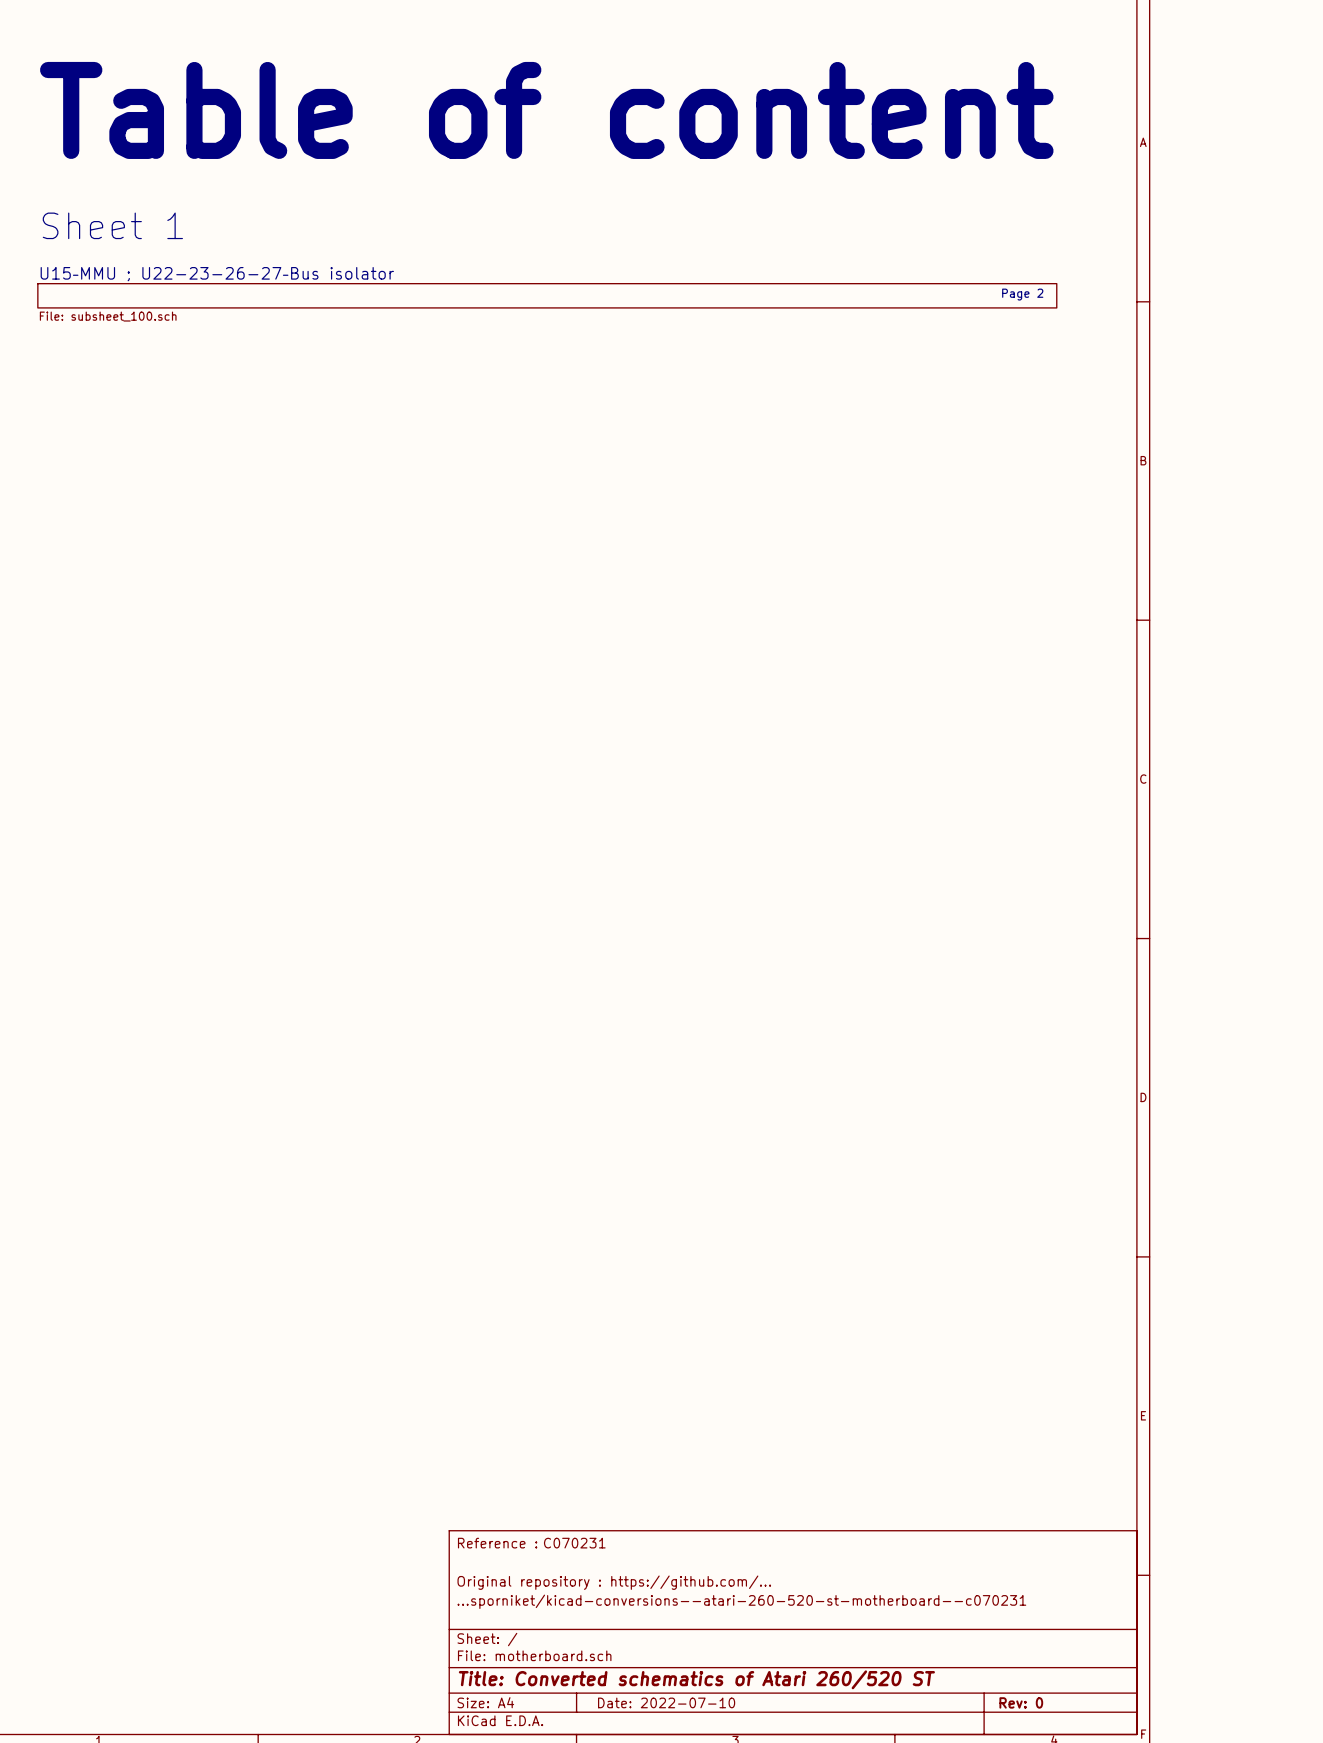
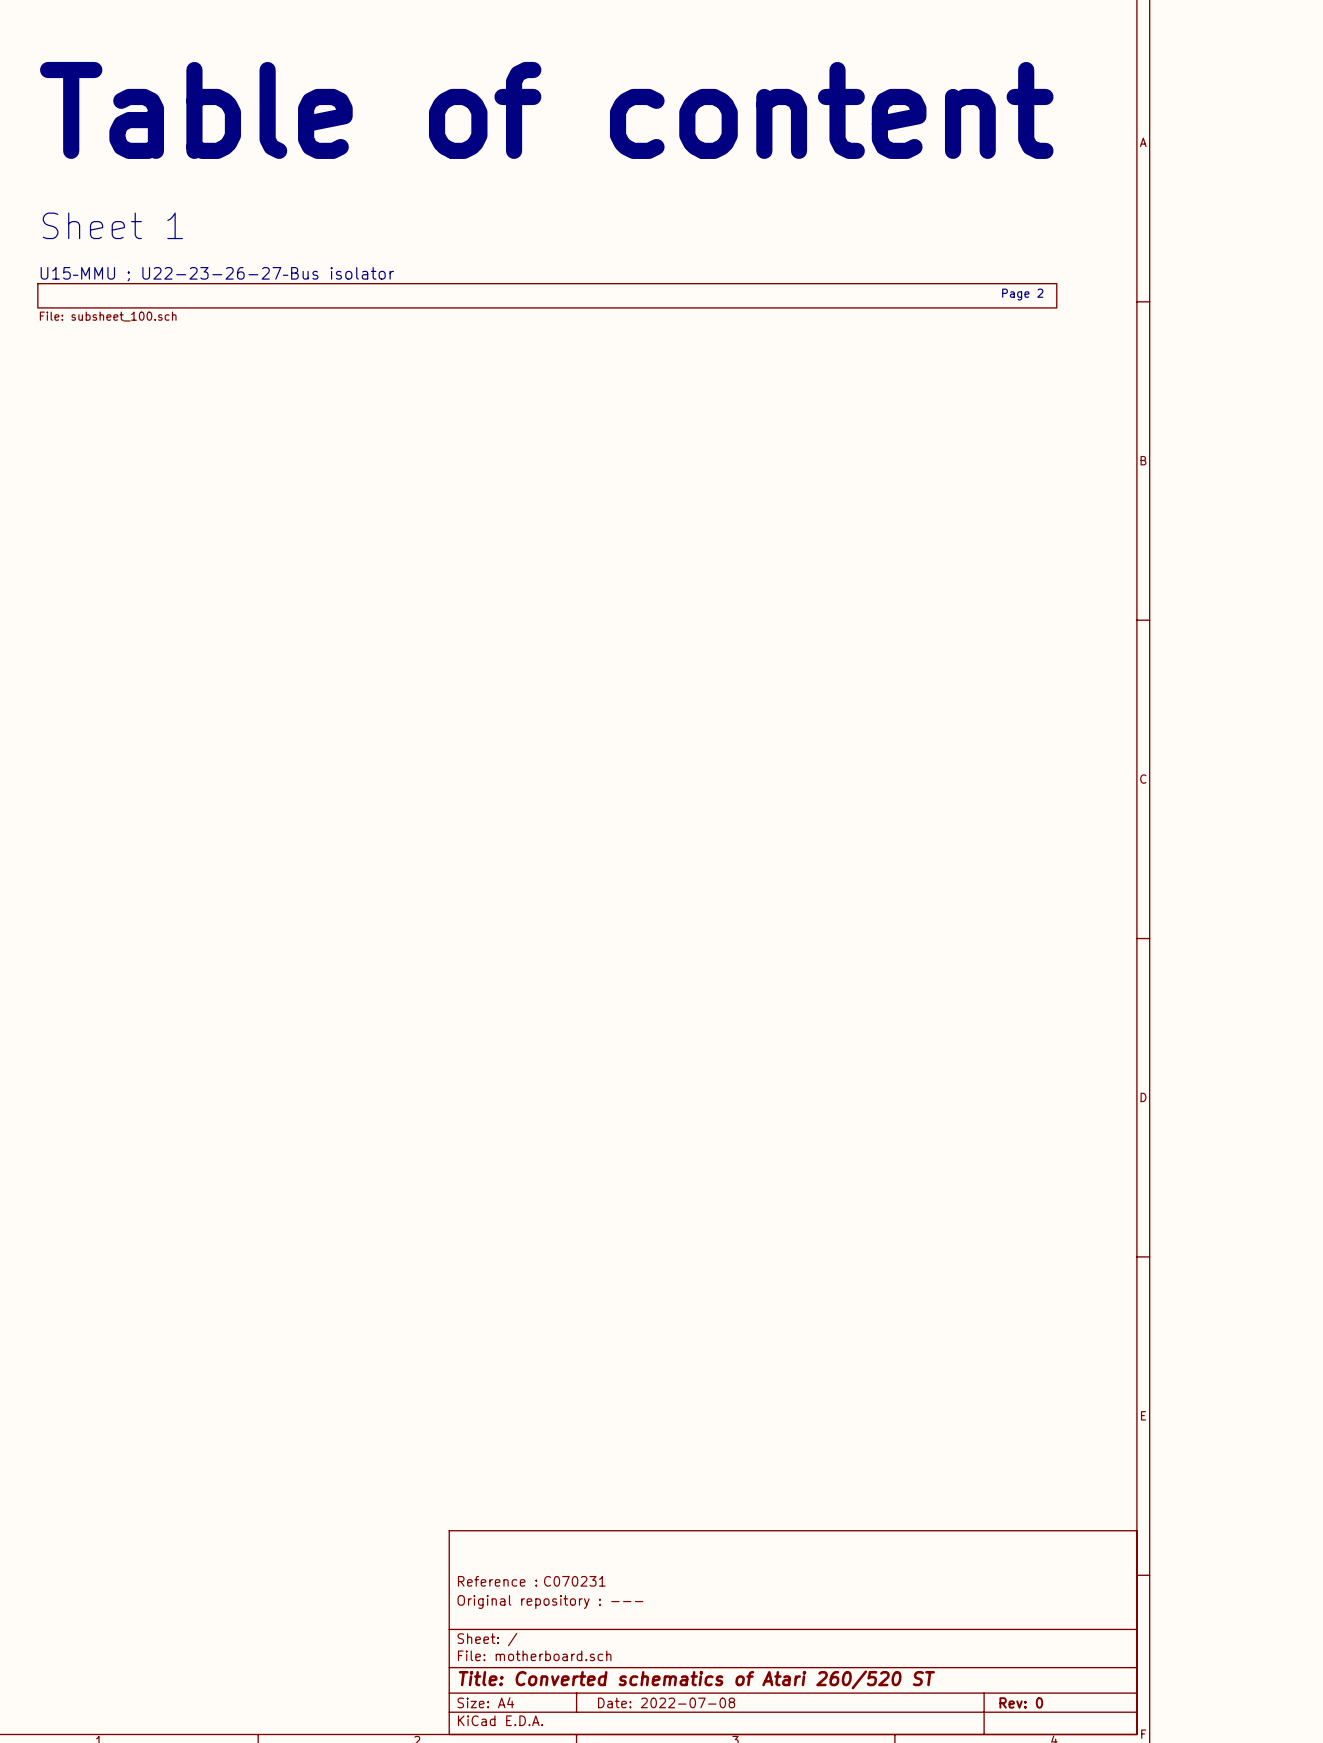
title block: Reference : C070231 (531, 1543) -> none
title block: Original repository : https://github.com/… (614, 1582) -> Reference : C070231 (531, 1581)
title block: …sporniket/kicad-conversions--atari-260-520-st-motherboard--c070231 (741, 1601) -> Original repository : --- (550, 1602)
title block: Date: 2022-07-10 (666, 1702) -> Date: 2022-07-08 (666, 1702)

